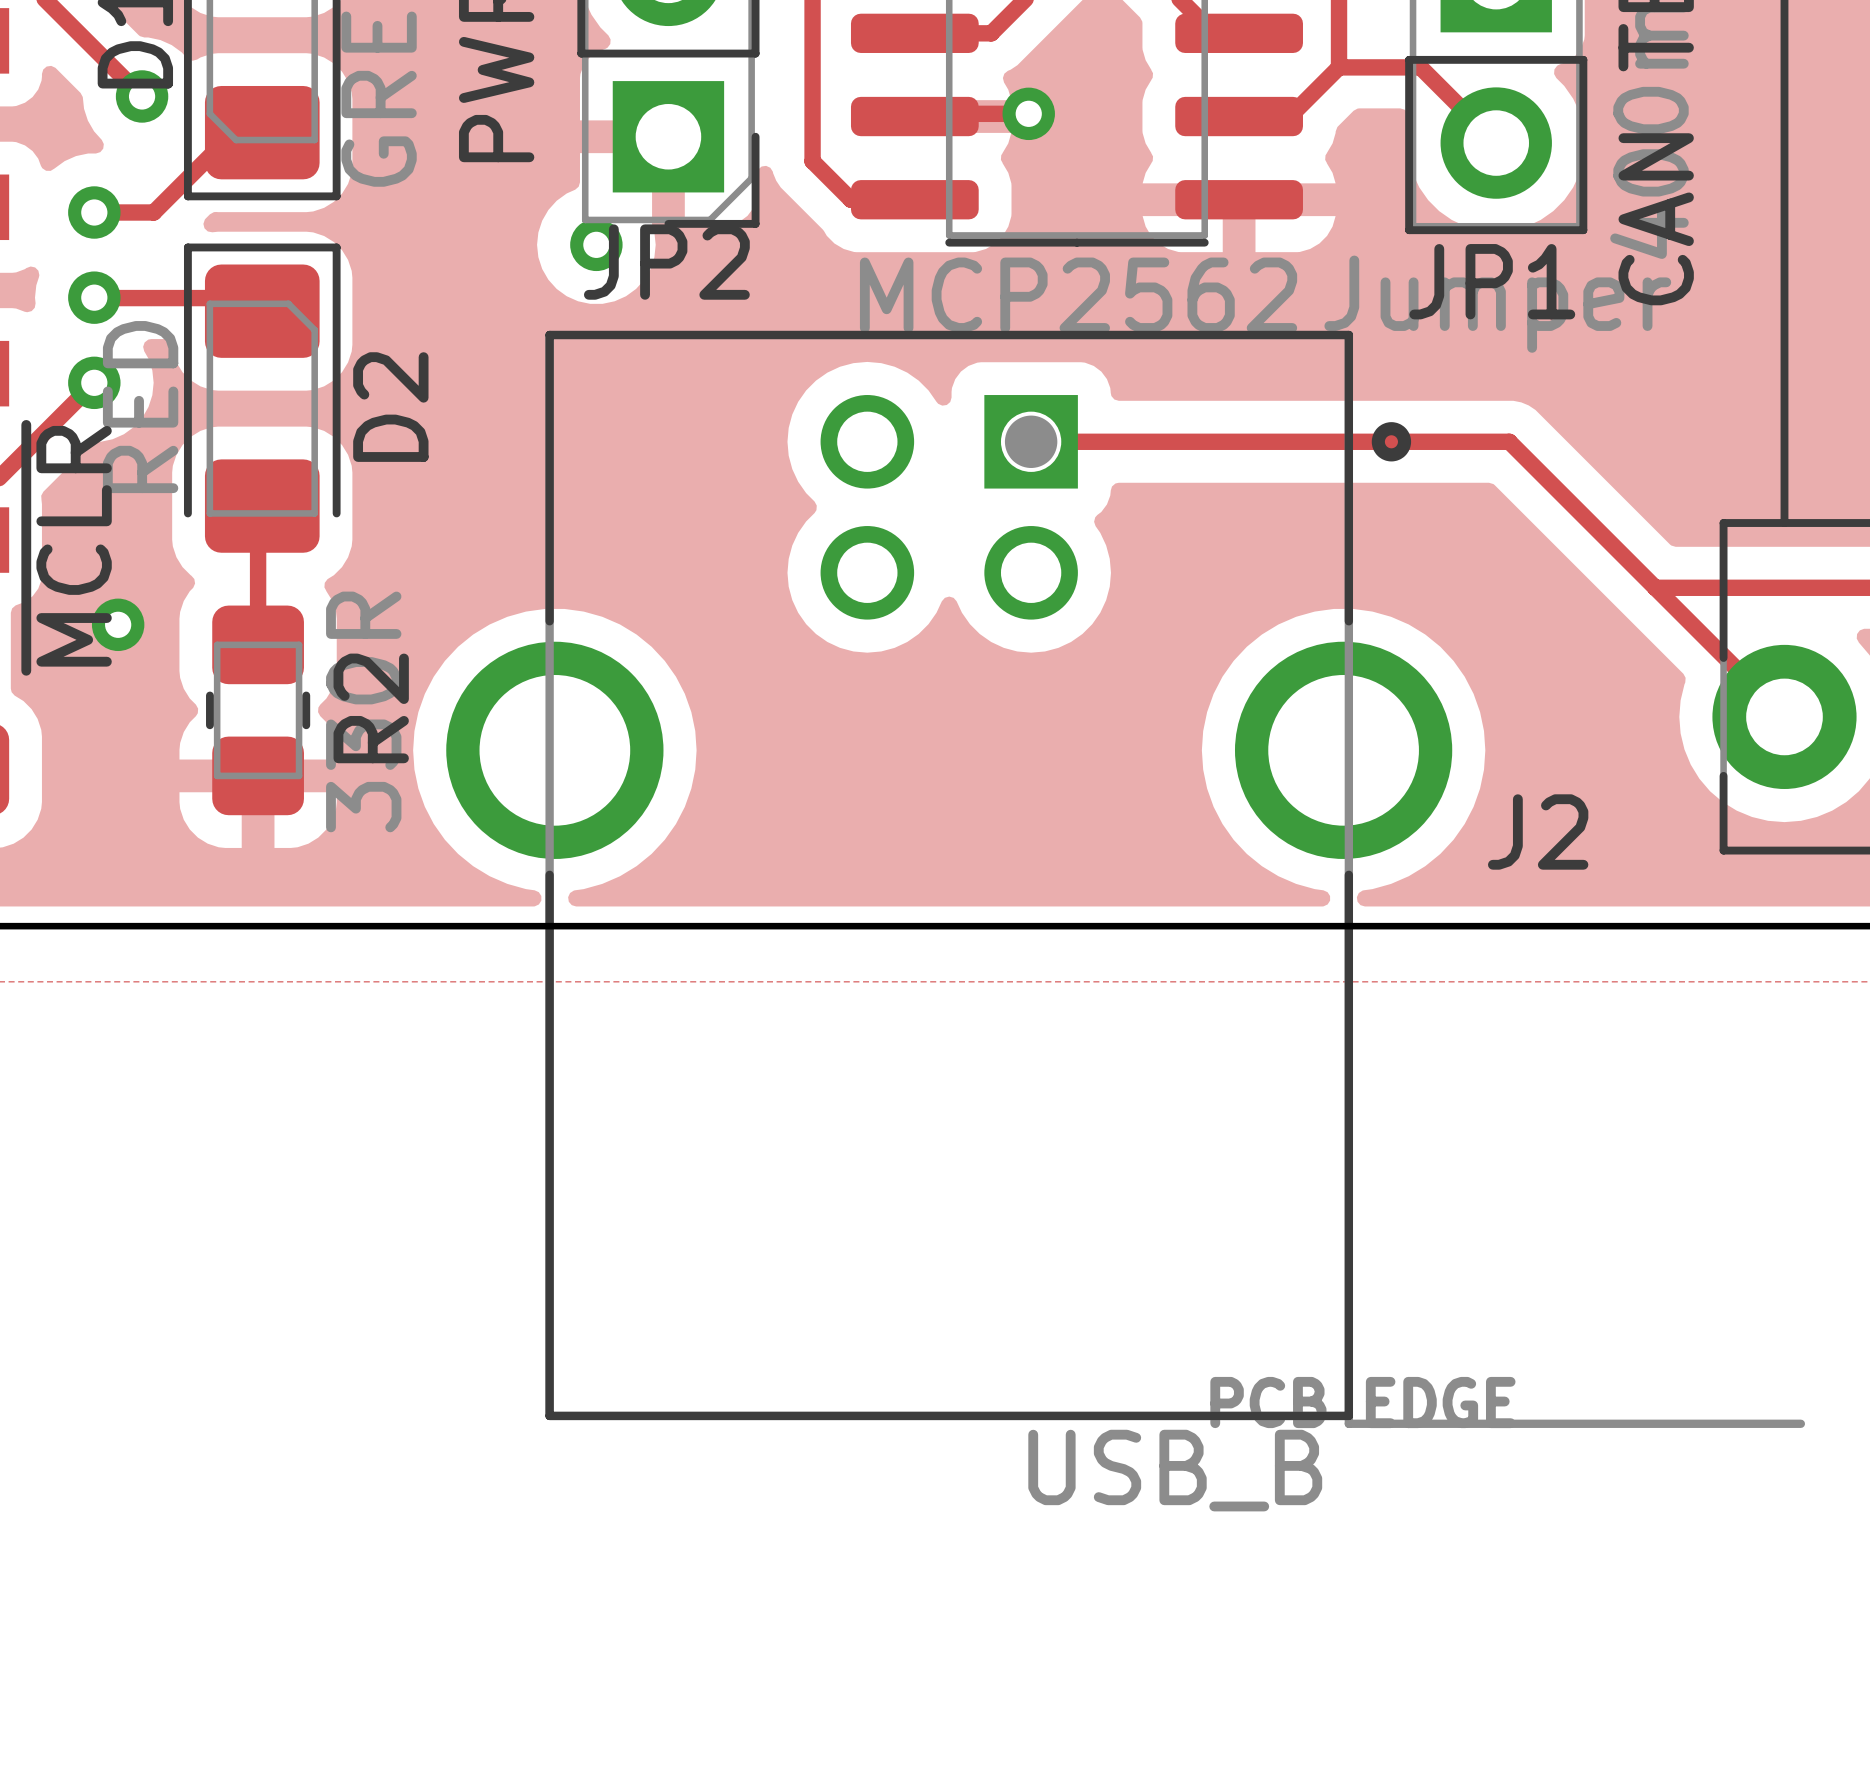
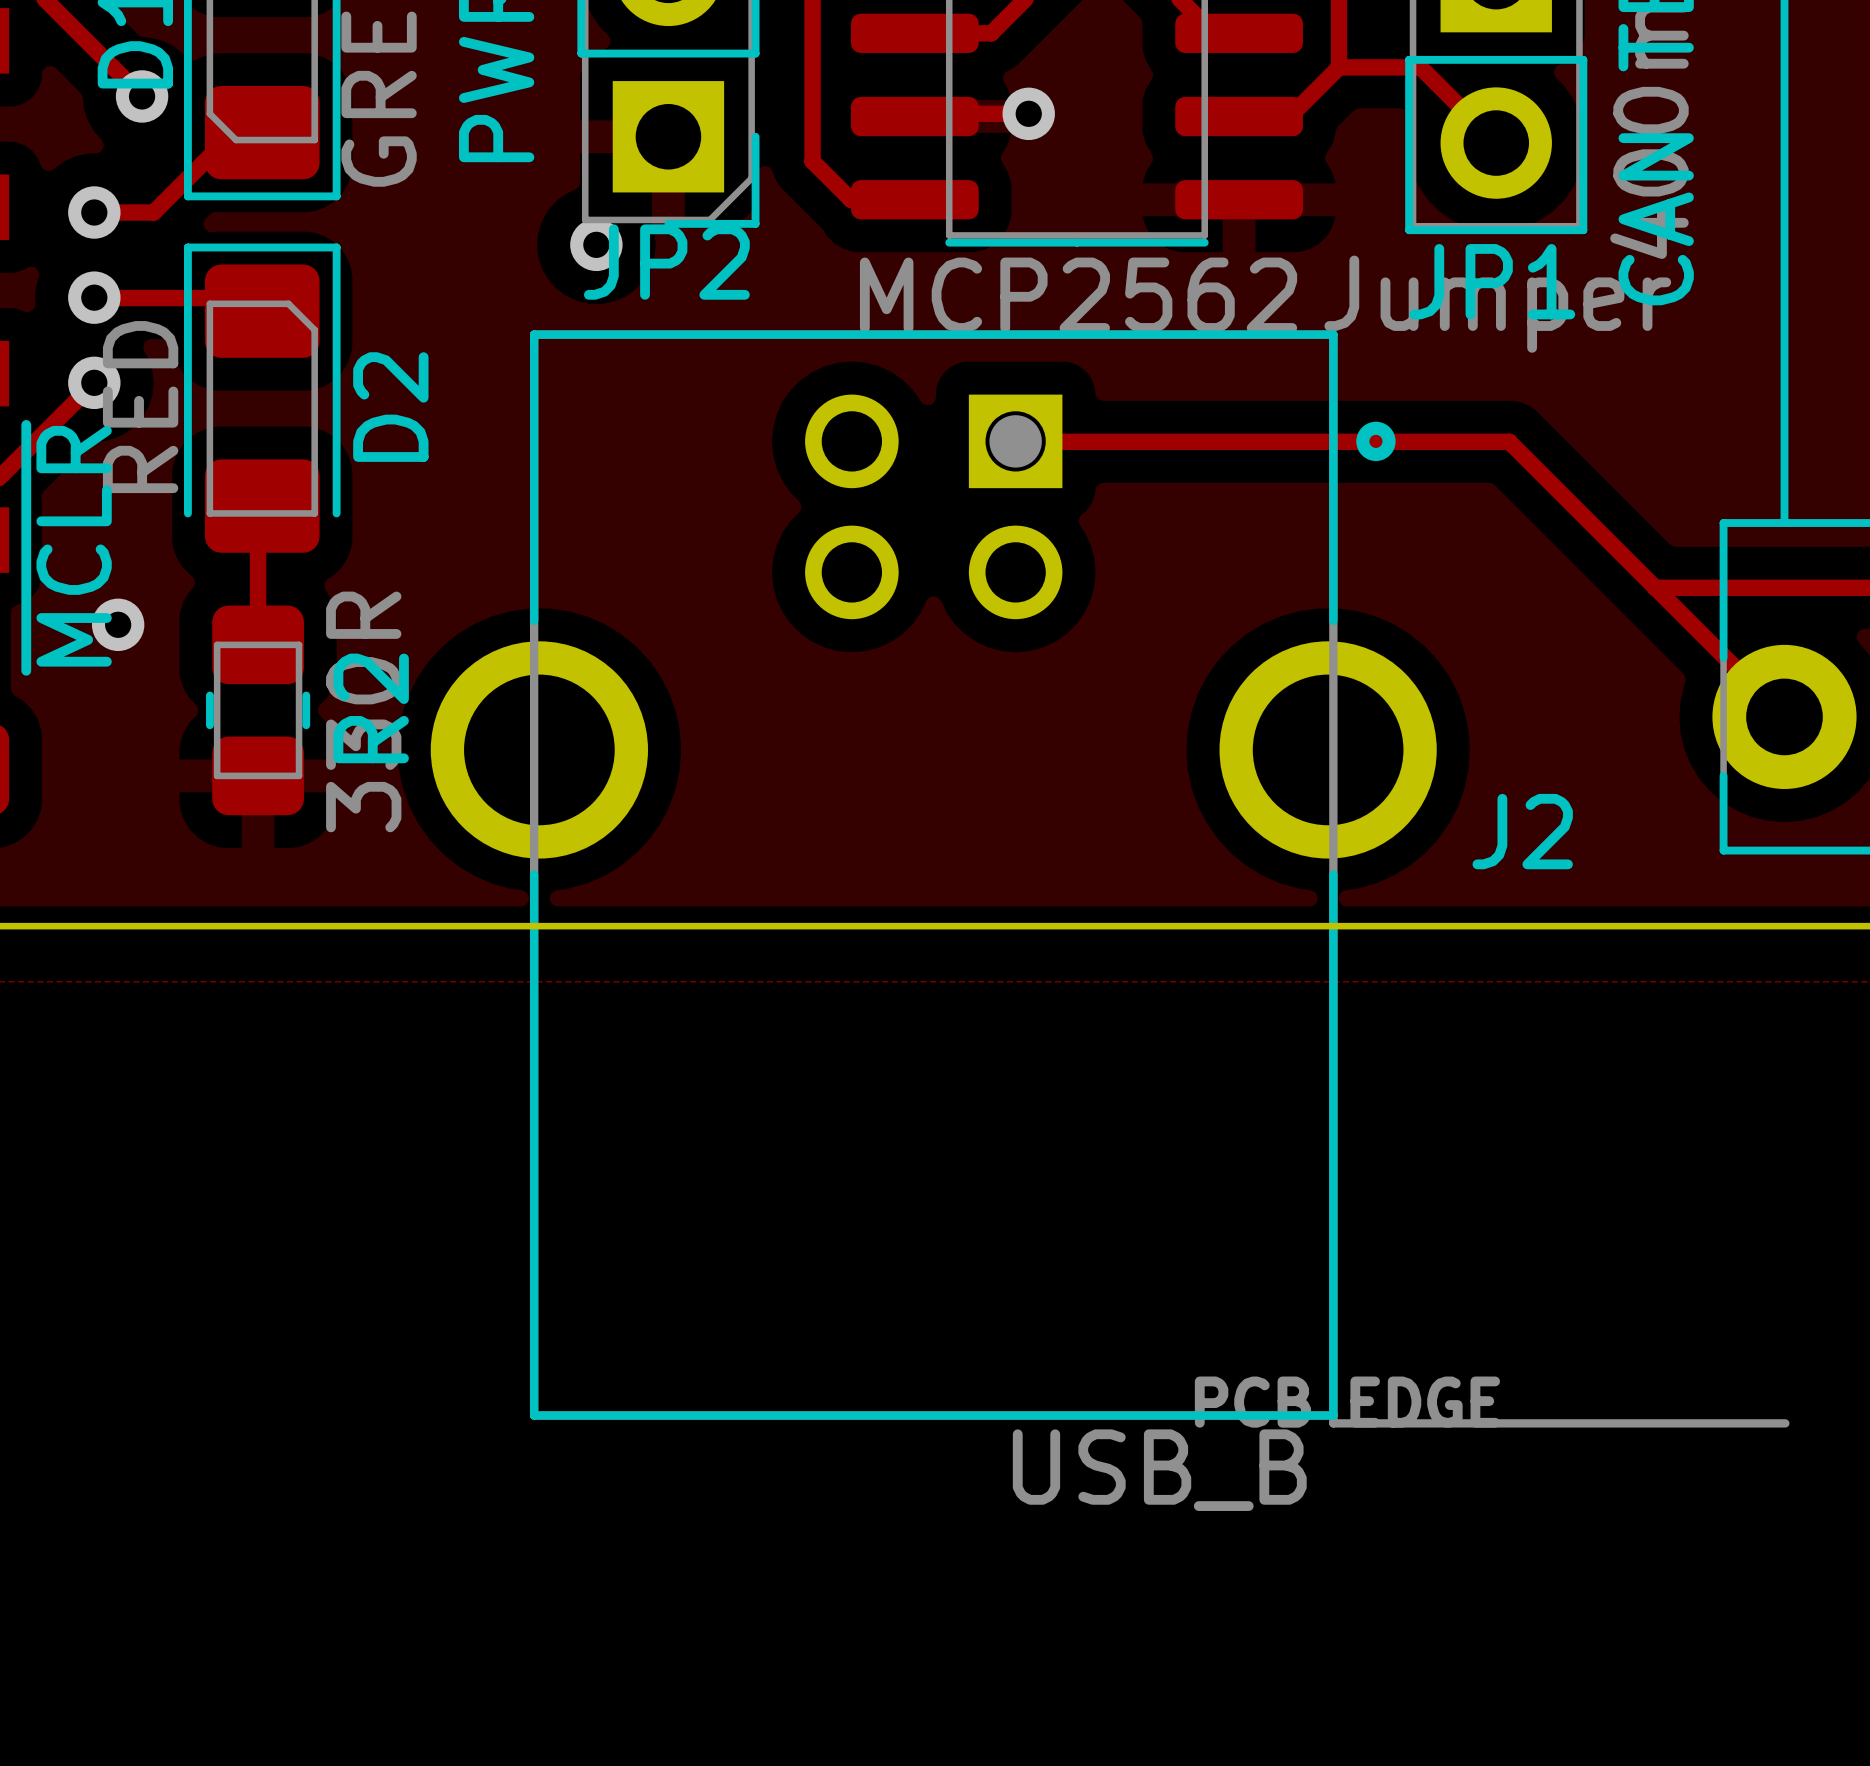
J2 position: (1125, 879) -> (1110, 878)

